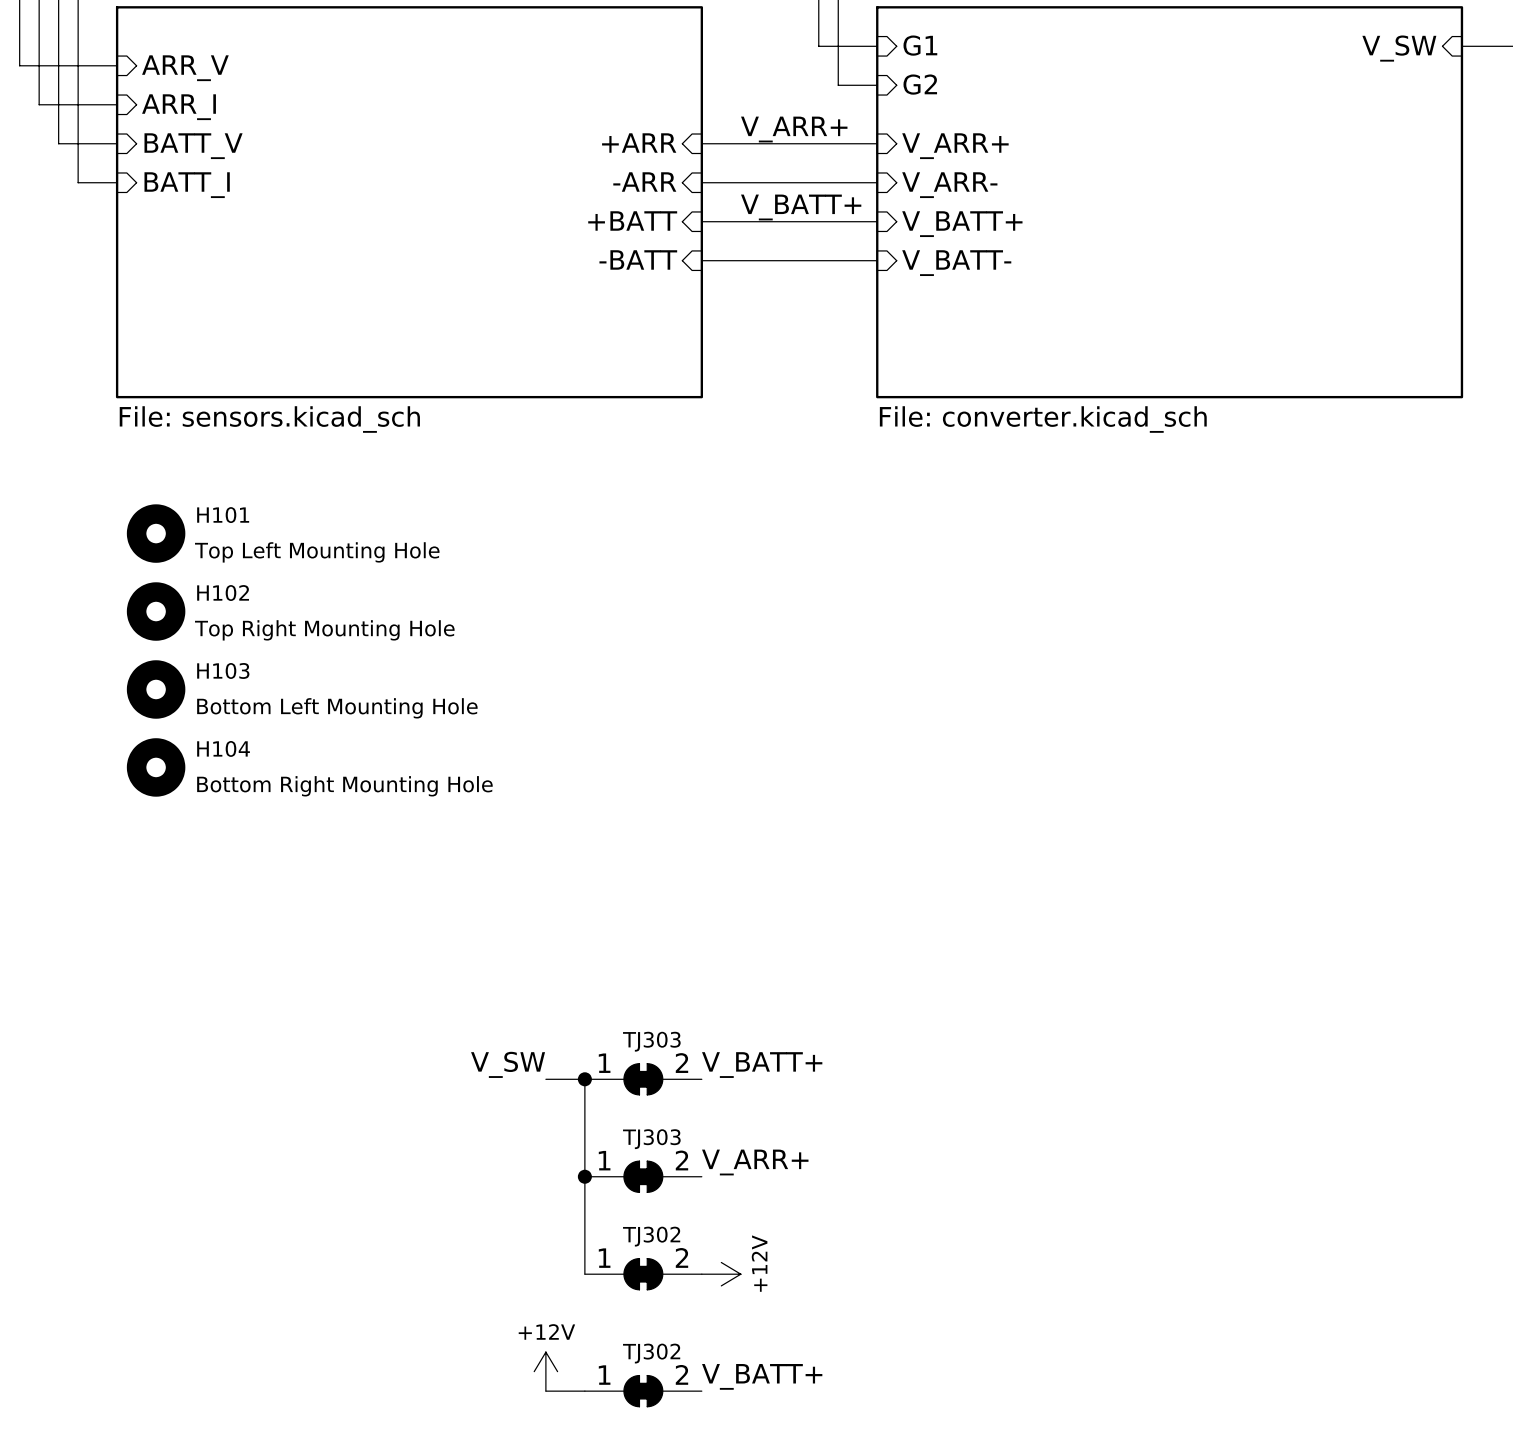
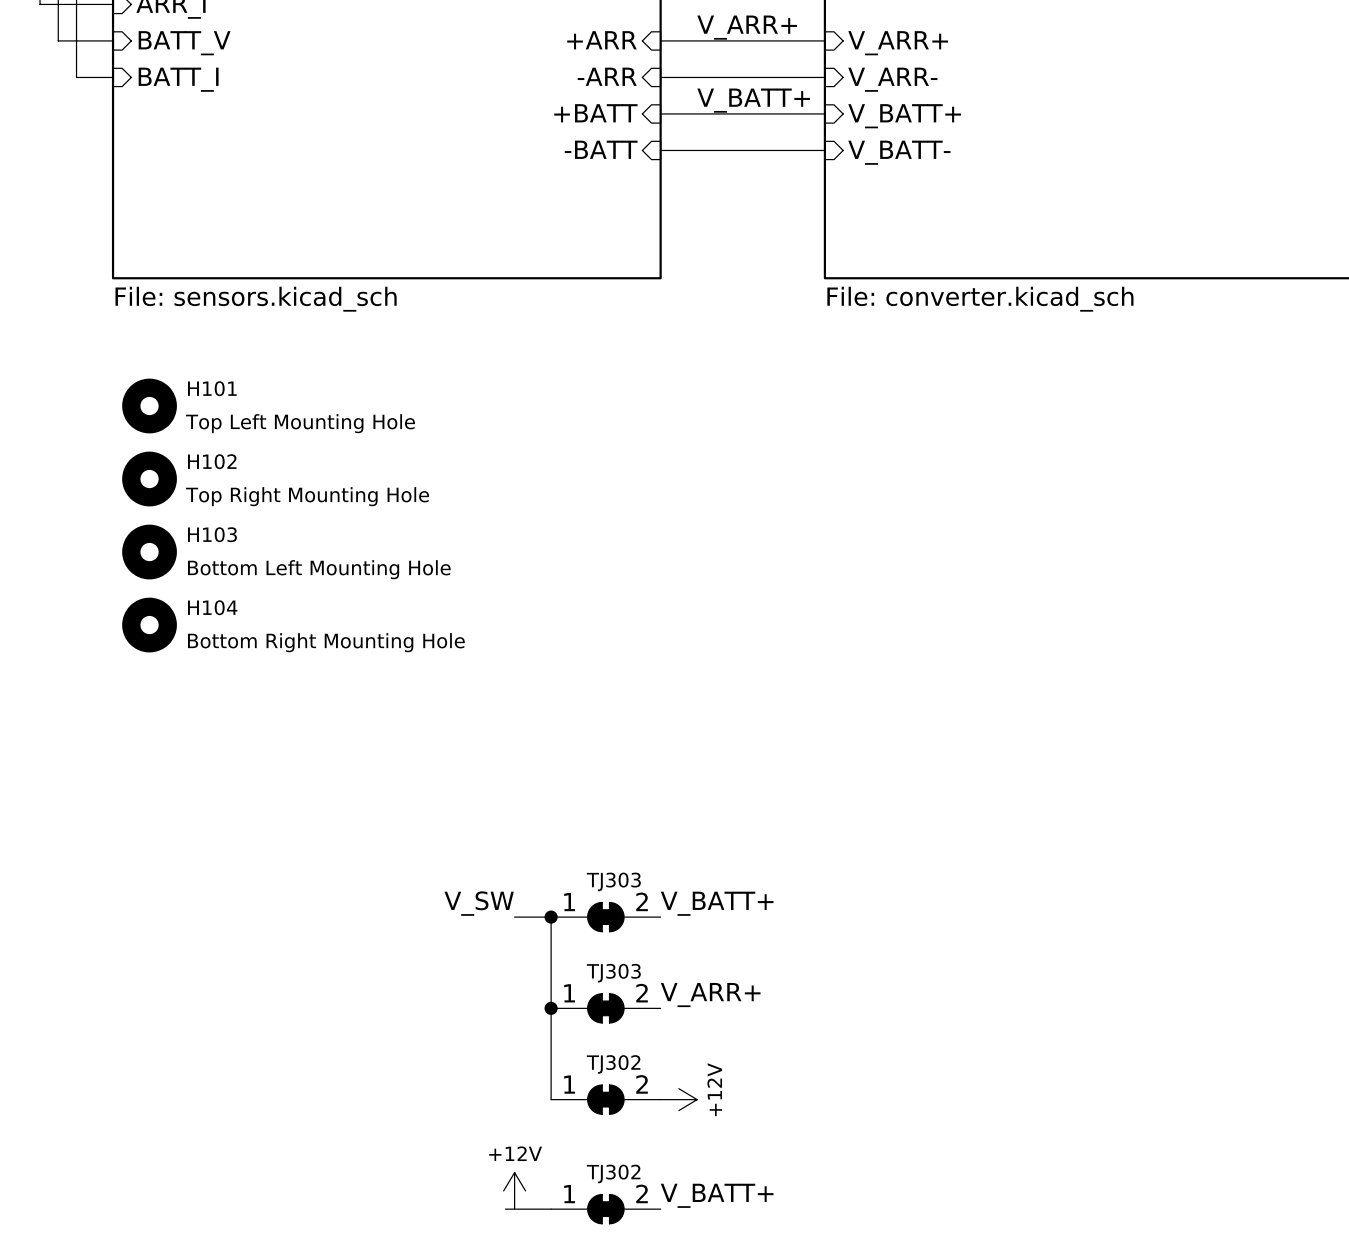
wire: none -> (505, 1209) (514, 1209)

